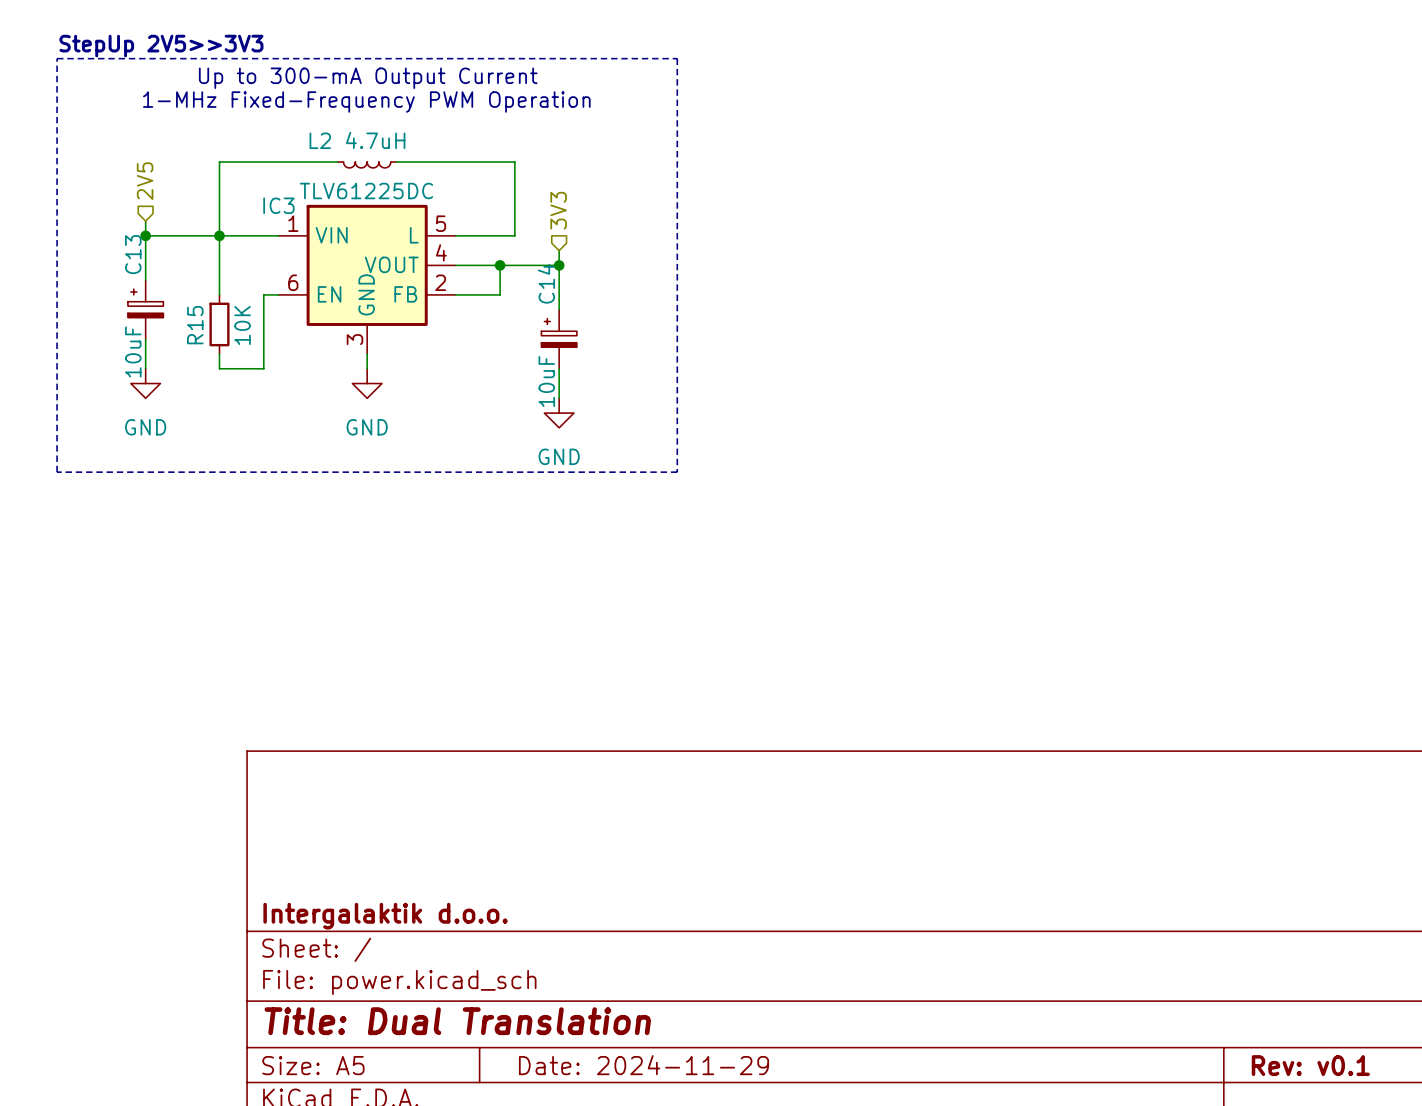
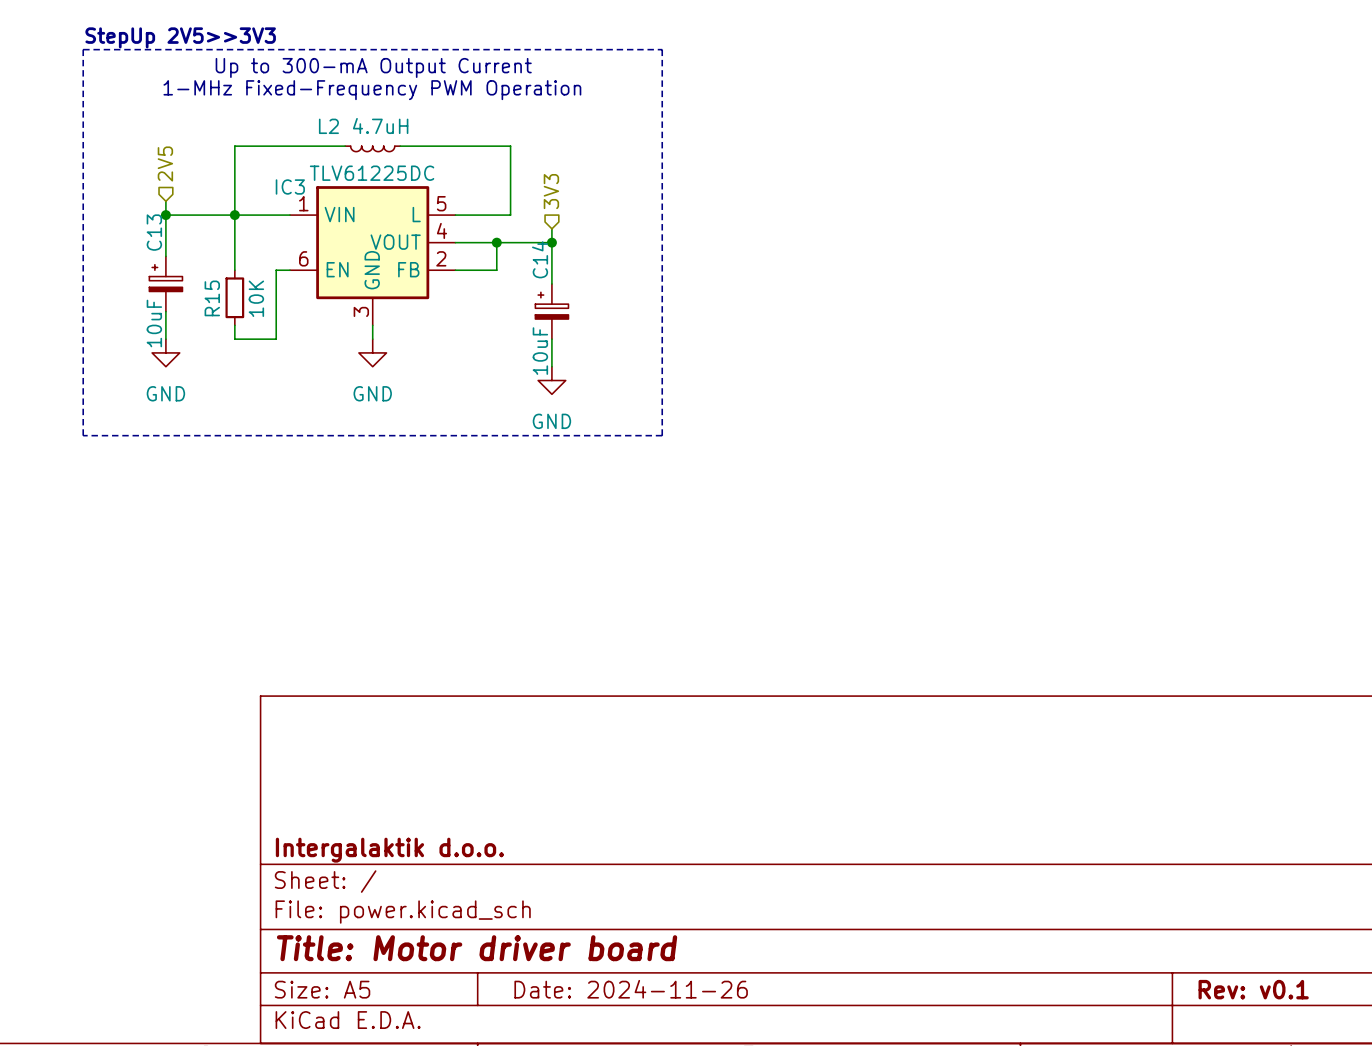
title block: Title: Dual Translation (457, 1021) -> Title: Motor driver board (477, 948)
title block: Date: 2024-11-29 (643, 1065) -> Date: 2024-11-26 (631, 989)

